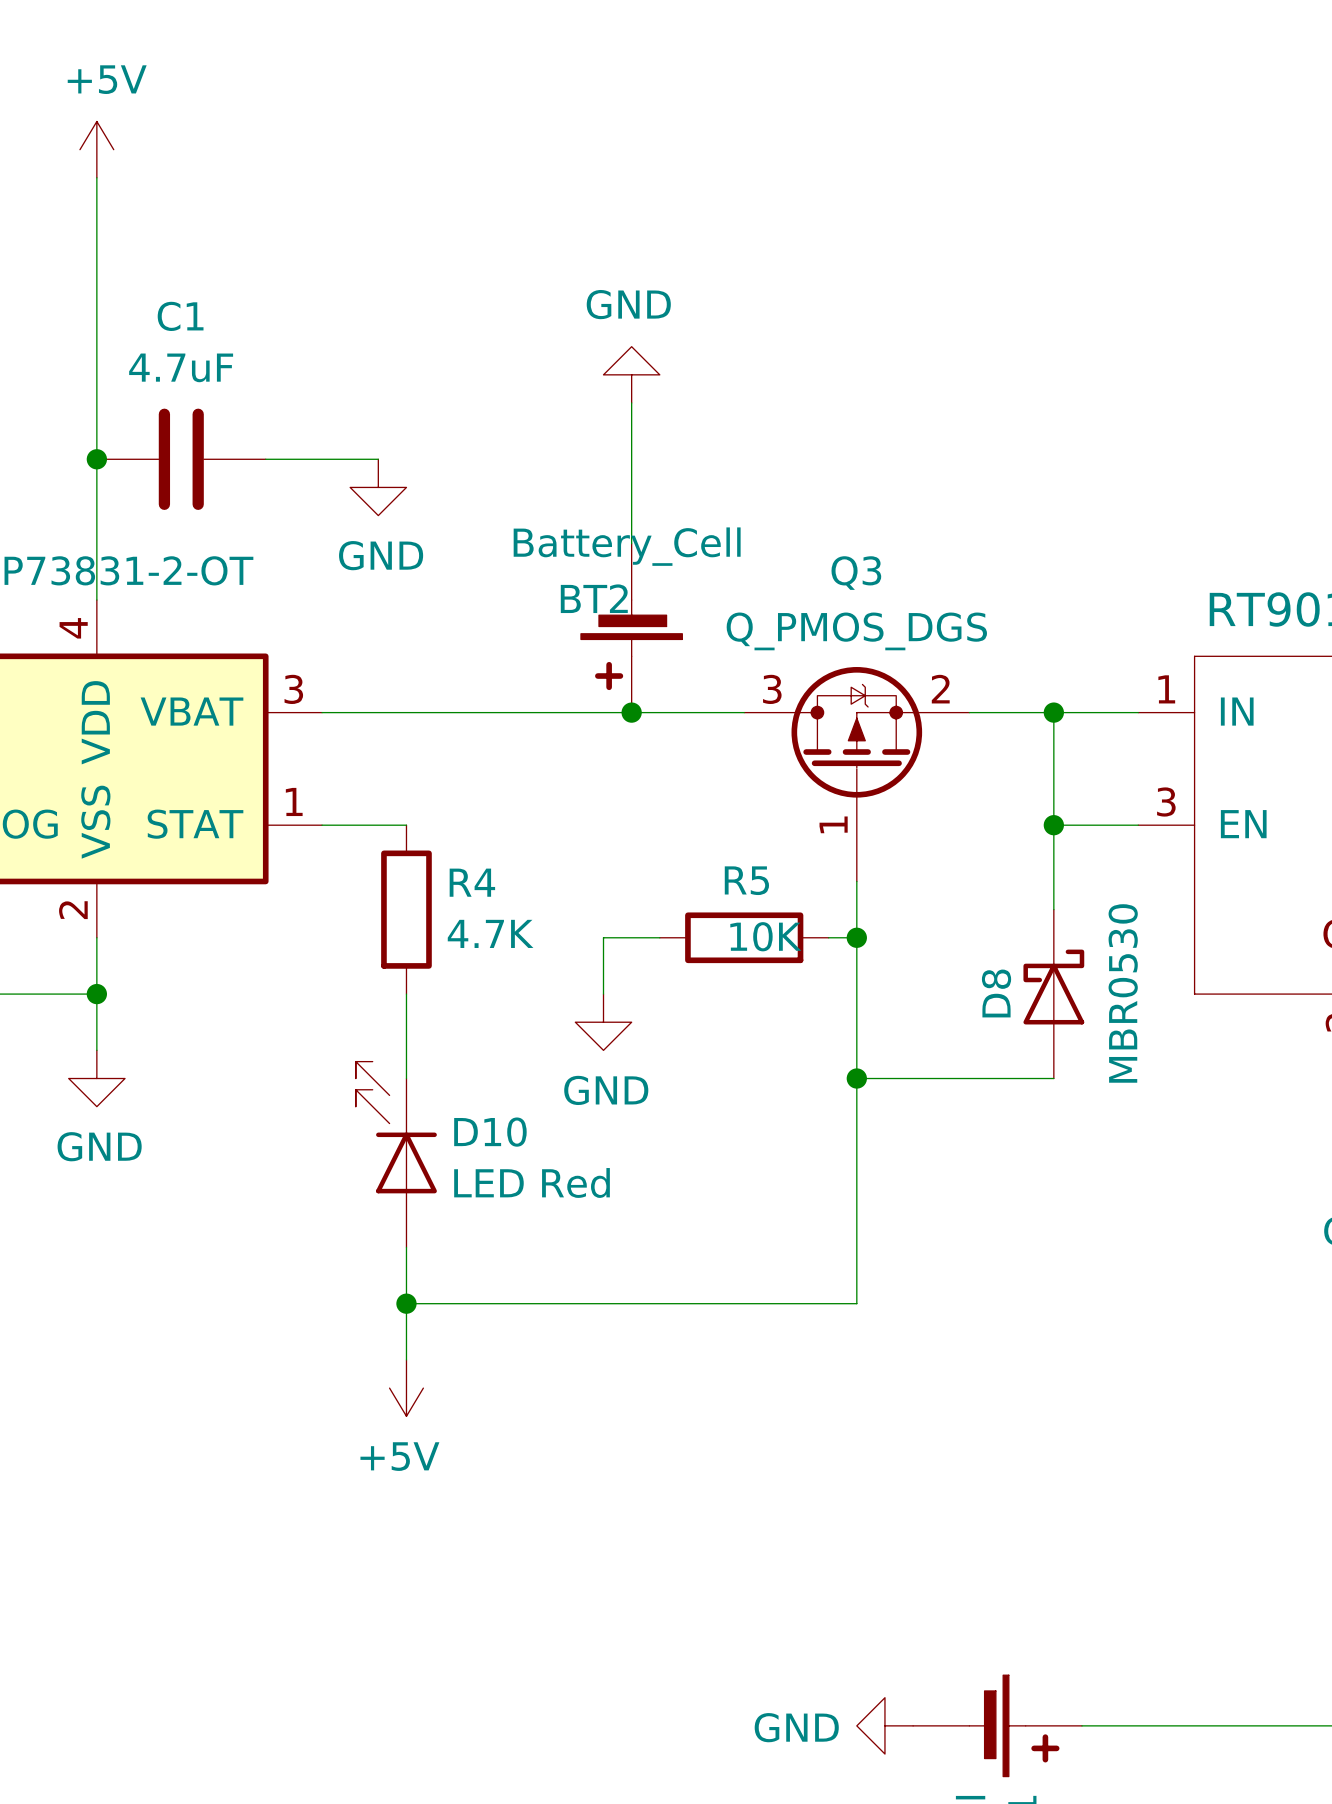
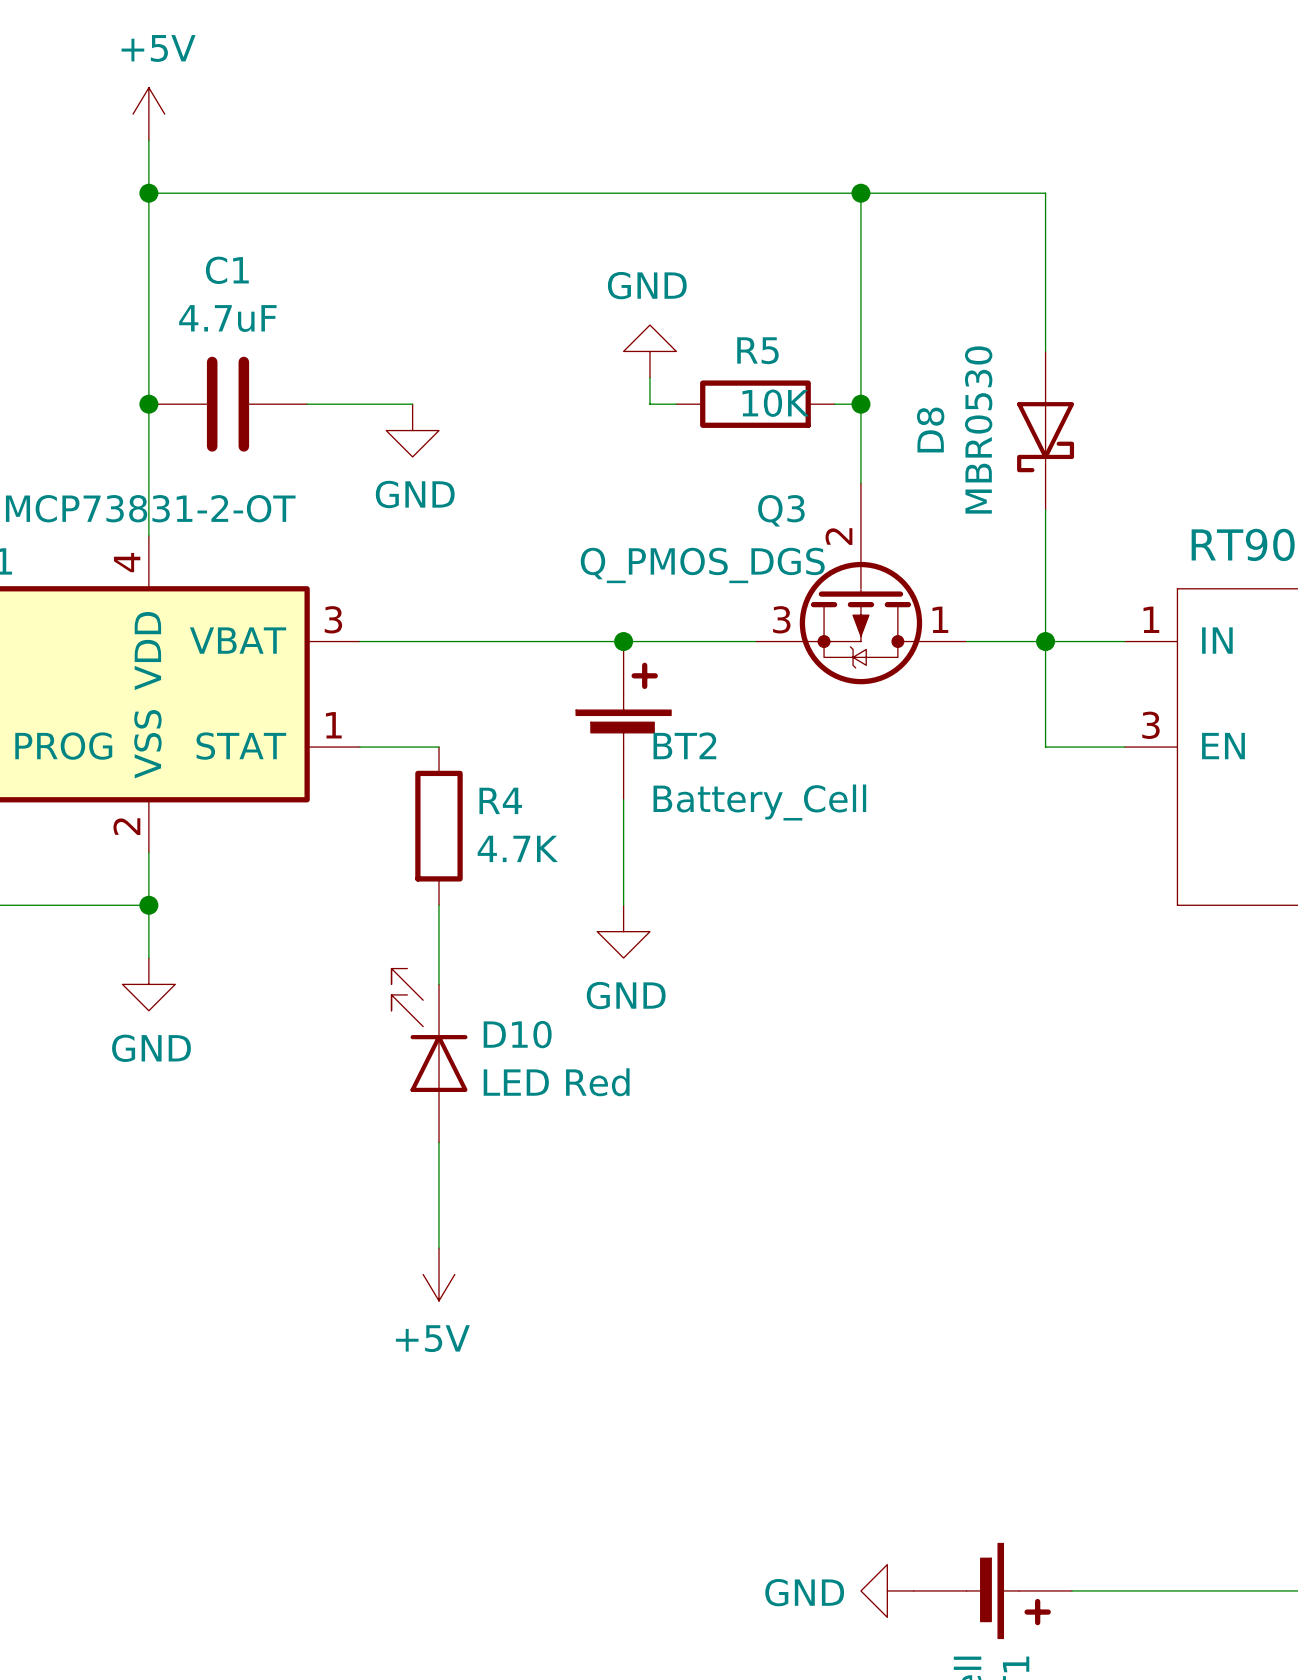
wire: none -> (148, 193) (1045, 193) (1045, 351)
junction: none -> (148, 193)
wire: none -> (860, 193) (860, 483)
junction: none -> (860, 193)
power symbol position: GND (631, 374) -> GND (649, 351)
wire: (631, 459) (631, 543) -> (649, 404) (676, 404)
junction: none -> (860, 404)
BT2 value position: Battery_Cell (627, 546) -> Battery_Cell (759, 802)
wire: none -> (1045, 509) (1045, 641)
Q3 name position: Q3 (856, 573) -> Q3 (781, 510)
BT2 position: (631, 628) -> (623, 720)
Q3 value position: Q_PMOS_DGS (856, 631) -> Q_PMOS_DGS (702, 565)
BT2 rotation: 0° (631, 645) -> 180° (623, 704)
Q3 symbol: [744, 667, 970, 882] -> [755, 483, 967, 685]
junction position: (631, 712) -> (623, 641)
wire: (1053, 825) (1053, 909) -> none
junction: (1053, 825) -> none
wire: (856, 881) (856, 1303) (406, 1303) -> none
wire: (603, 937) (659, 937) -> (623, 852) (623, 799)
R5 position: (744, 937) -> (755, 404)
wire: (828, 937) (856, 937) -> (834, 404) (860, 404)
junction: (856, 937) -> none
D8 rotation: 0° (1053, 987) -> 180° (1045, 437)
D8 name position: D8 (996, 993) -> D8 (930, 430)
D8 position: (1053, 994) -> (1045, 430)
wire: (856, 1078) (1053, 1078) -> none
junction: (856, 1078) -> none
junction: (406, 1303) -> none

